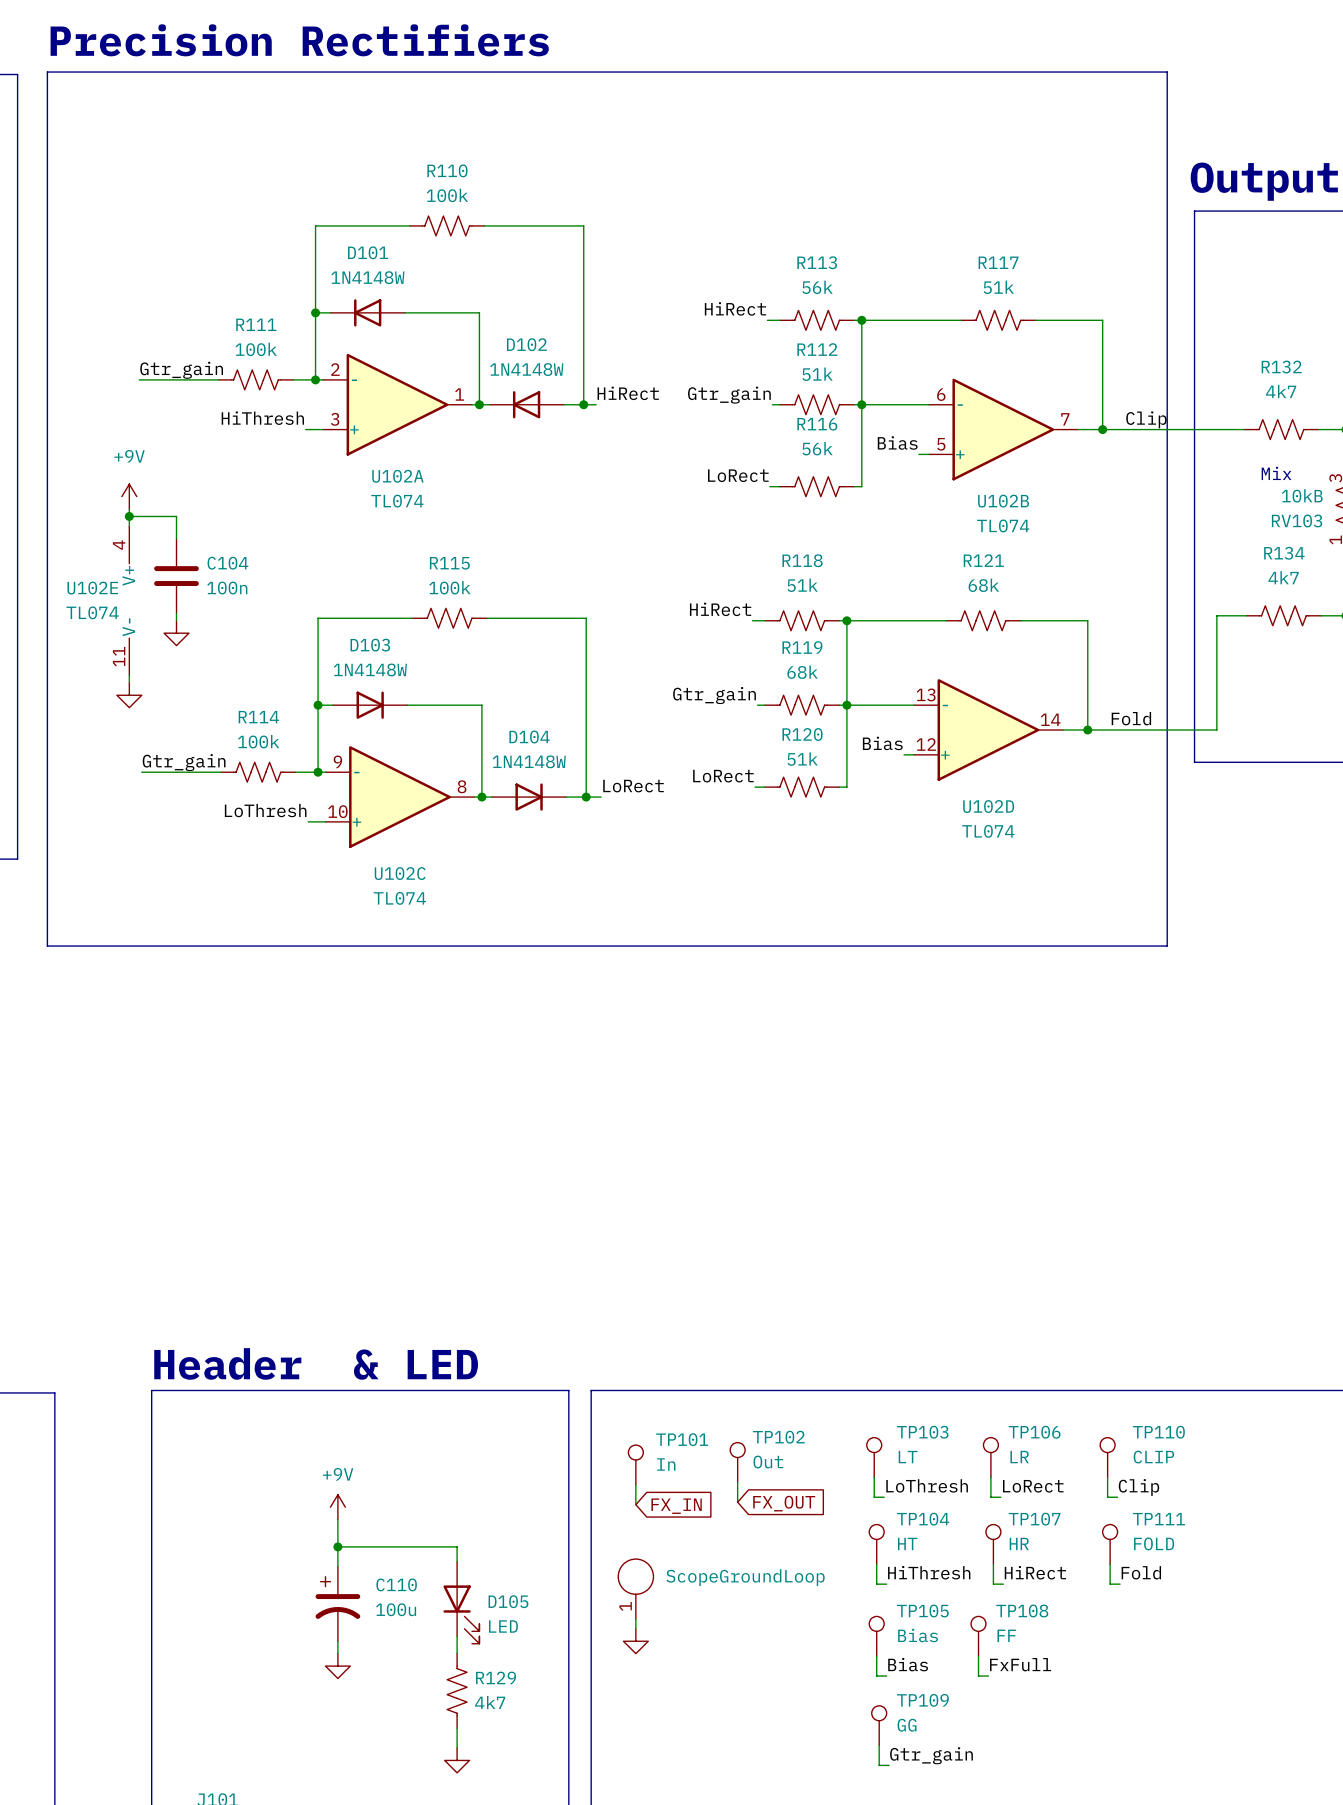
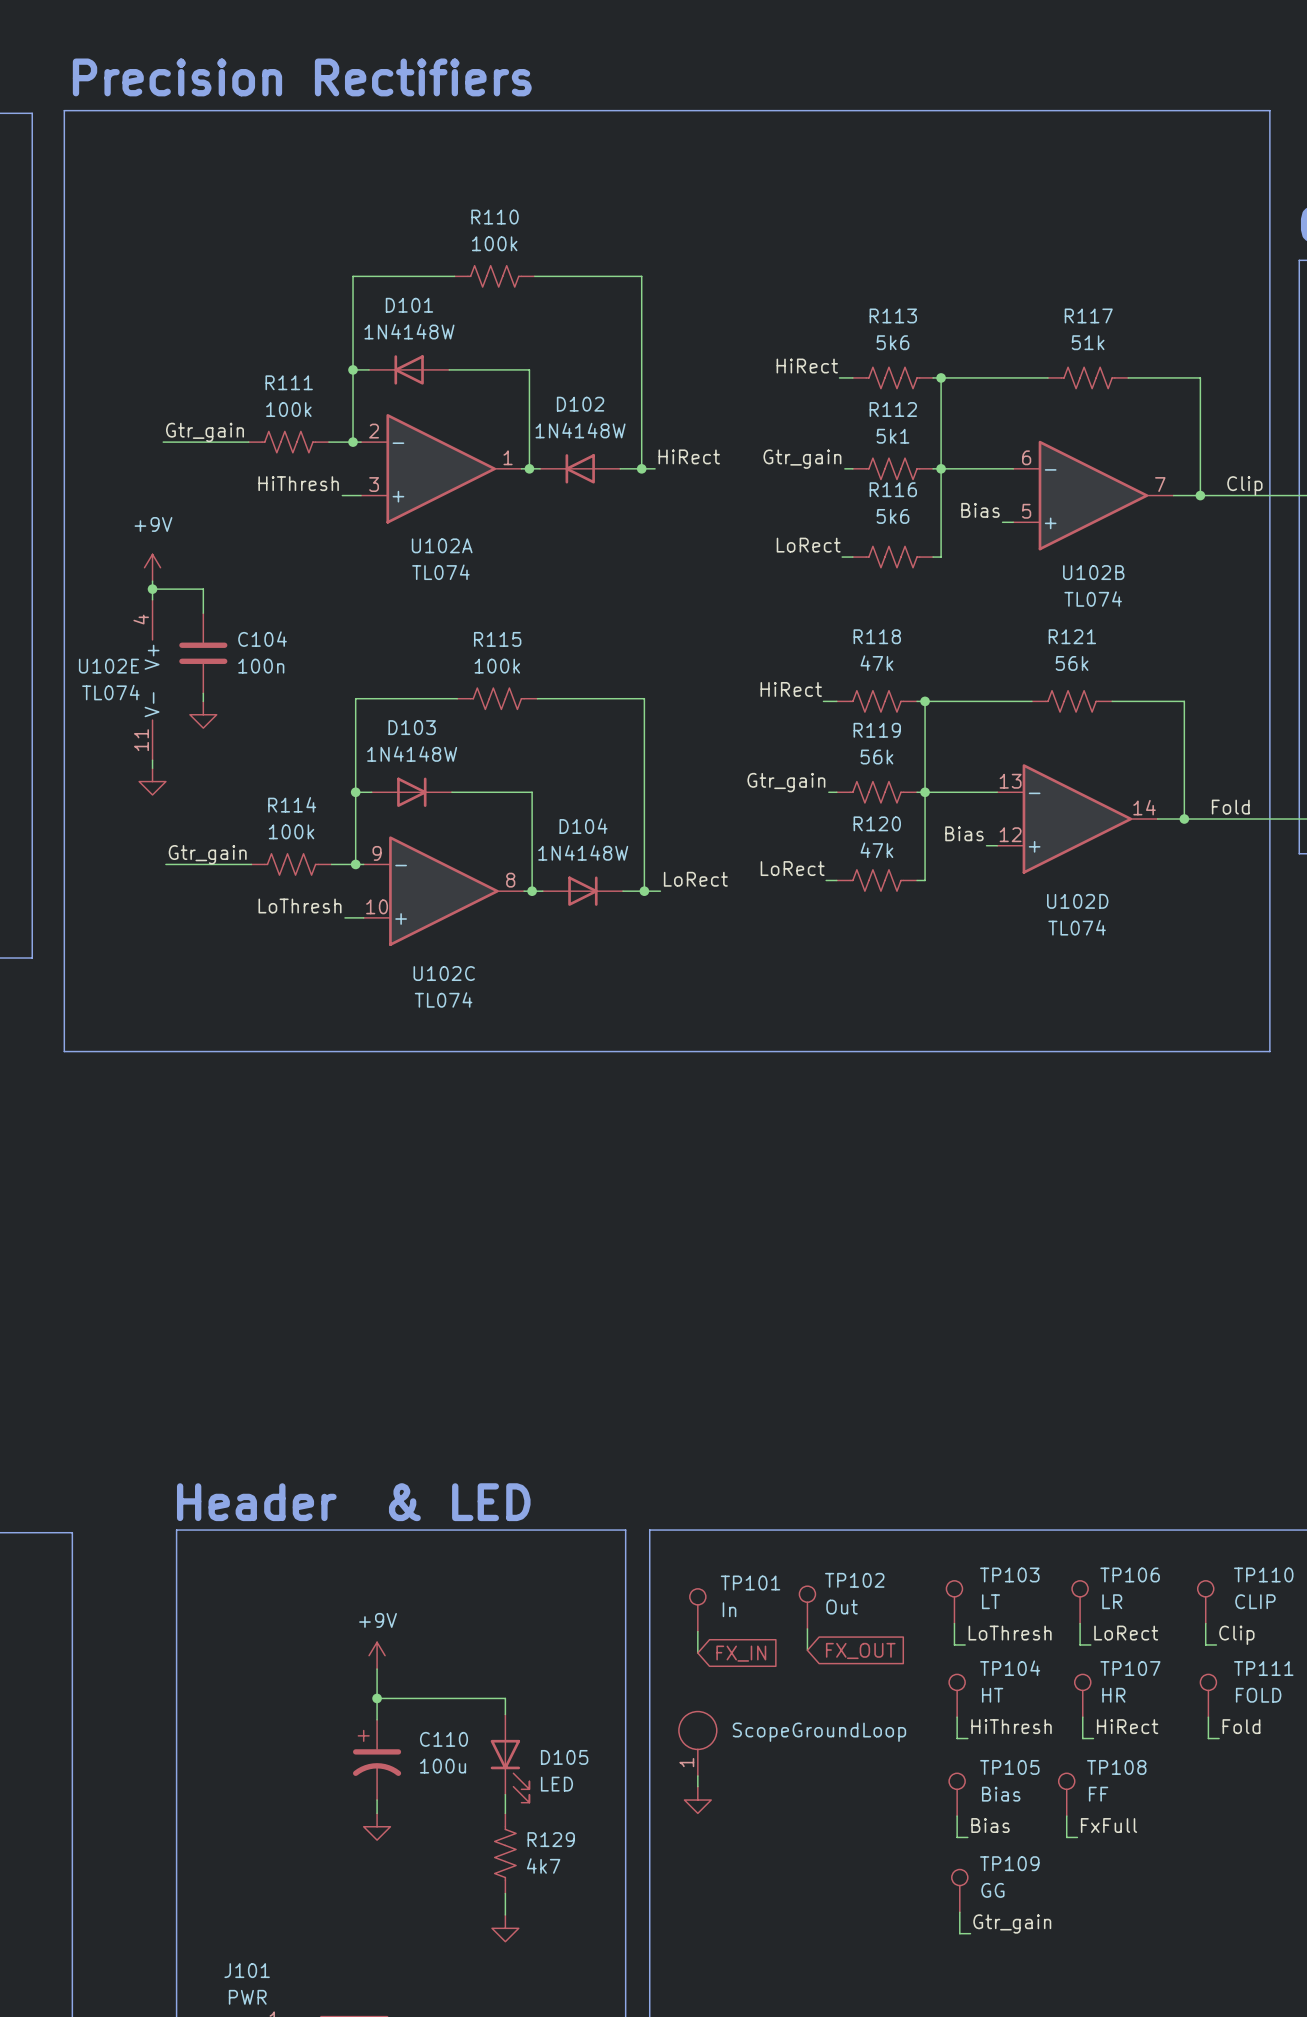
R113 value: 56k (817, 287) -> 5k6 (892, 342)
R112 value: 51k (817, 374) -> 5k1 (892, 436)
R116 value: 56k (817, 448) -> 5k6 (892, 516)
R118 value: 51k (802, 585) -> 47k (876, 663)
R121 value: 68k (983, 585) -> 56k (1072, 663)
R119 value: 68k (802, 672) -> 56k (876, 757)
R120 value: 51k (802, 759) -> 47k (876, 850)

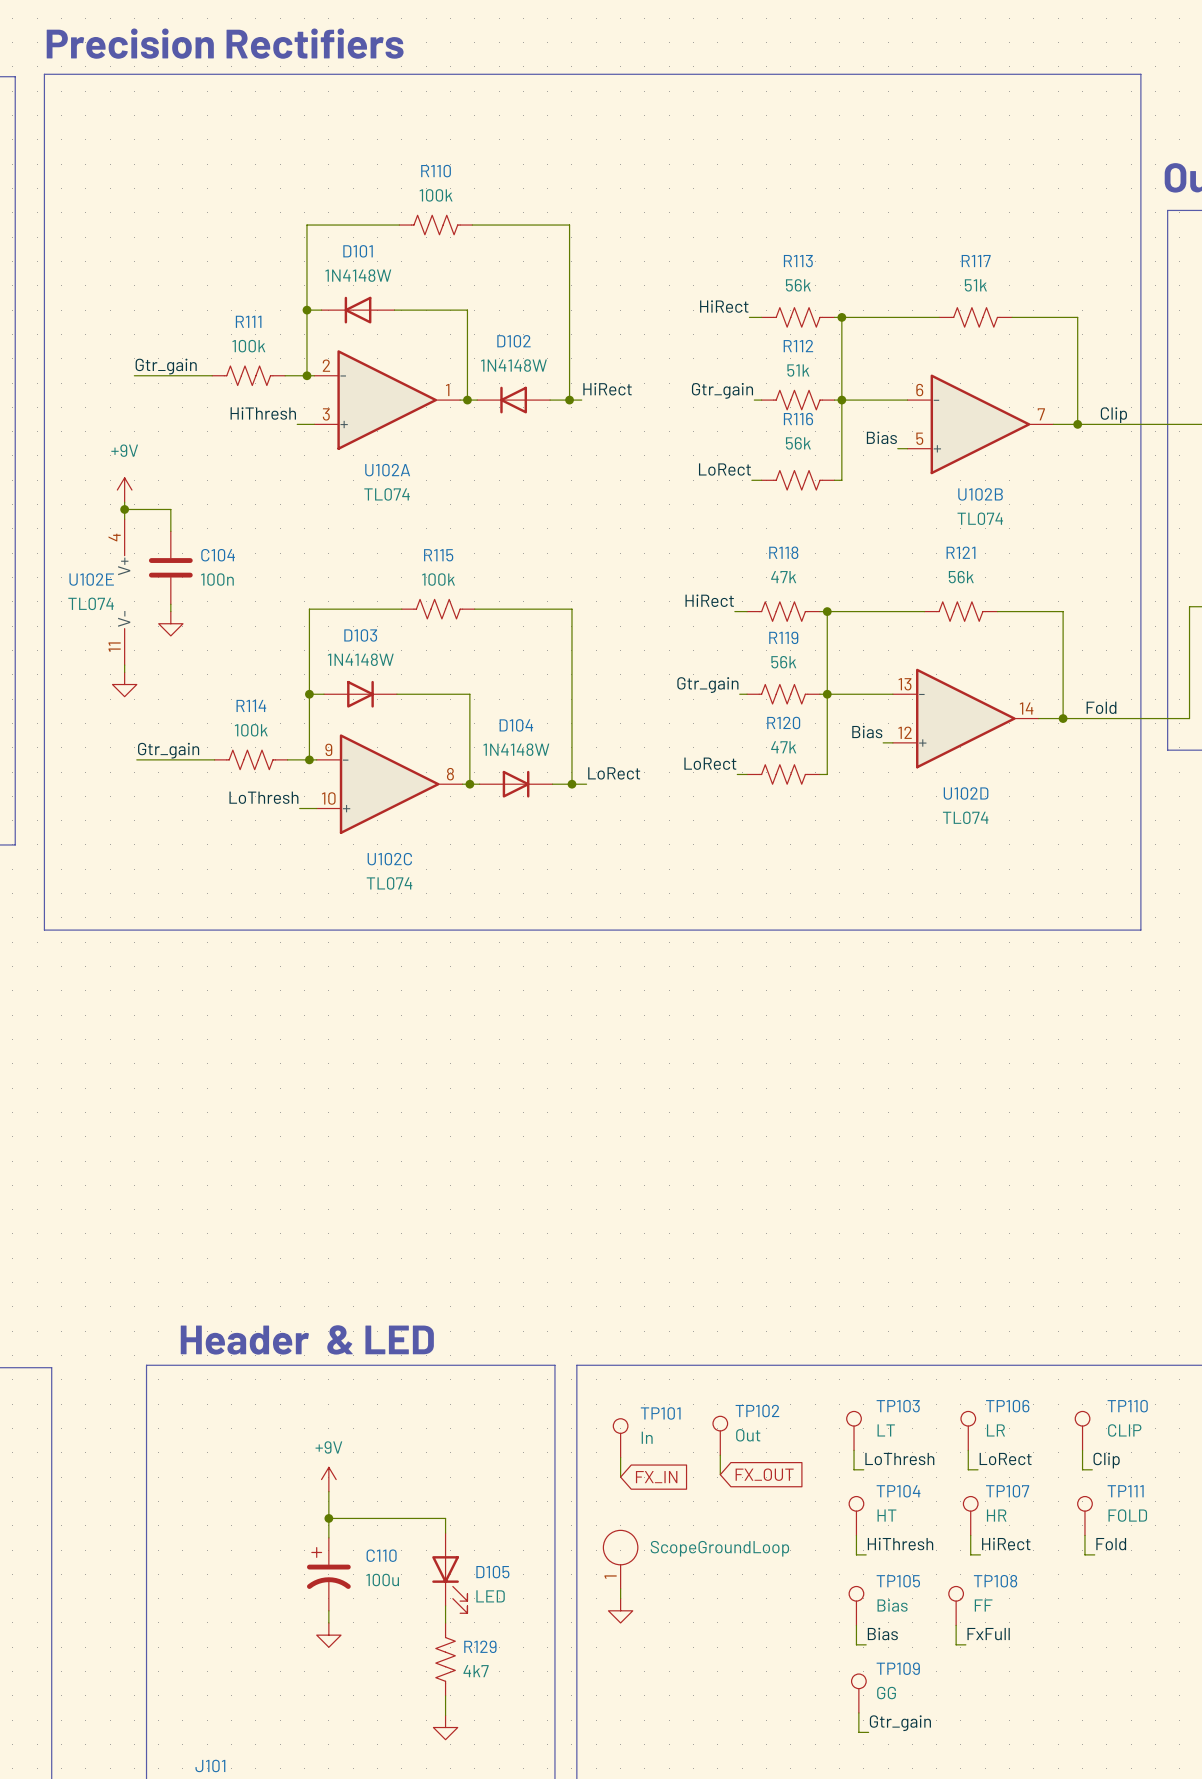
R113 value: 5k6 (892, 342) -> 56k (798, 285)
R112 value: 5k1 (892, 436) -> 51k (798, 370)
R116 value: 5k6 (892, 516) -> 56k (798, 443)

